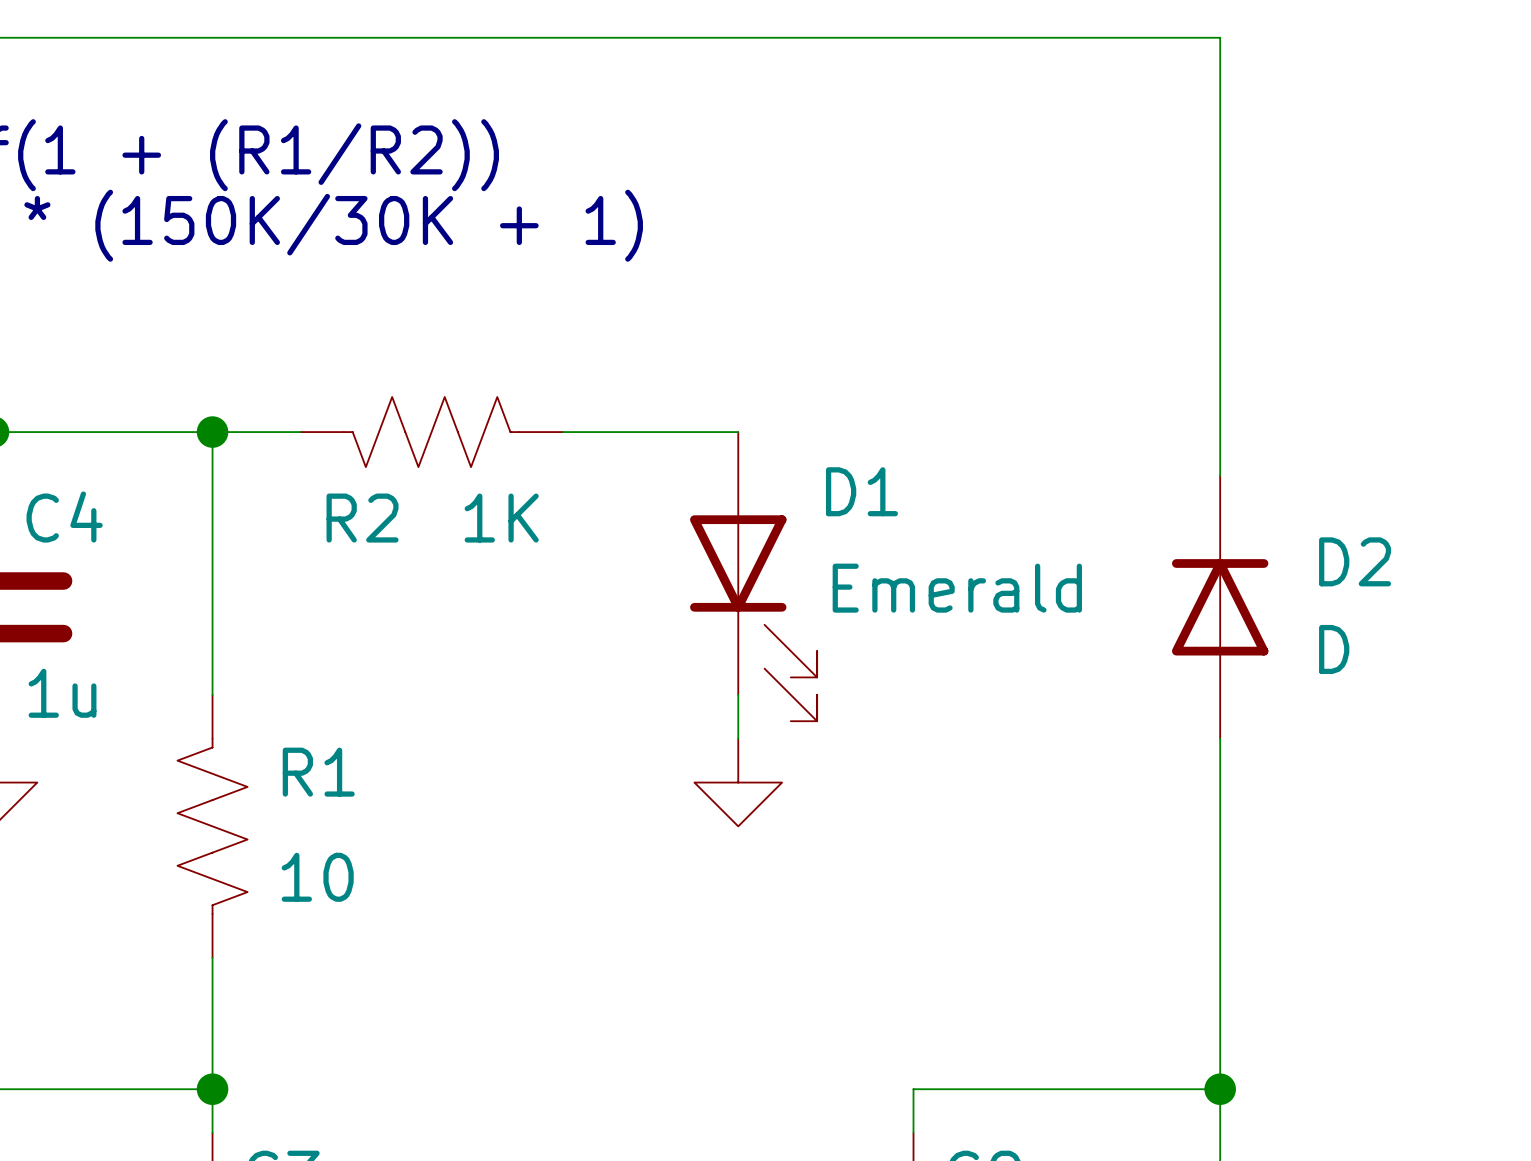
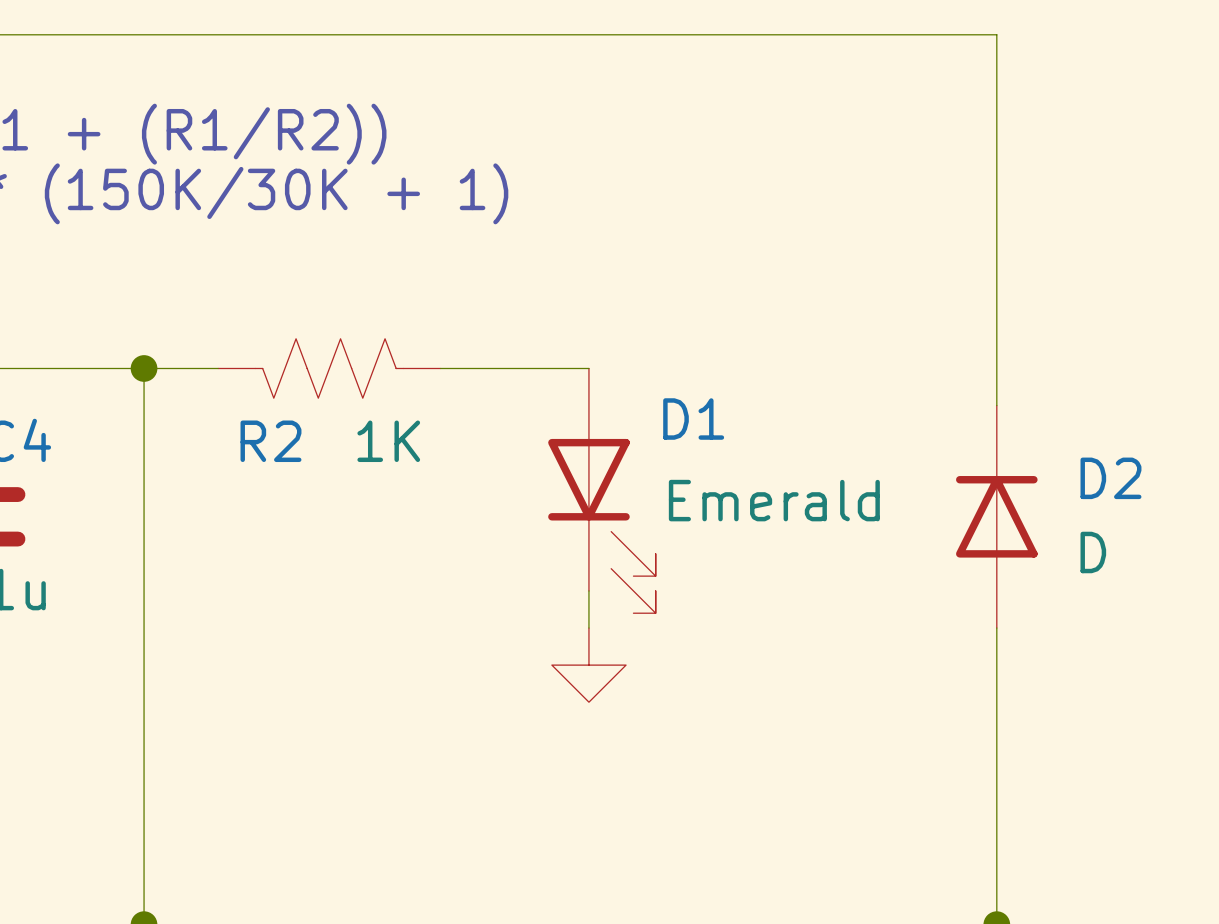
wire: none -> (144, 590) (144, 813)
R1: 10 (212, 826) -> none

